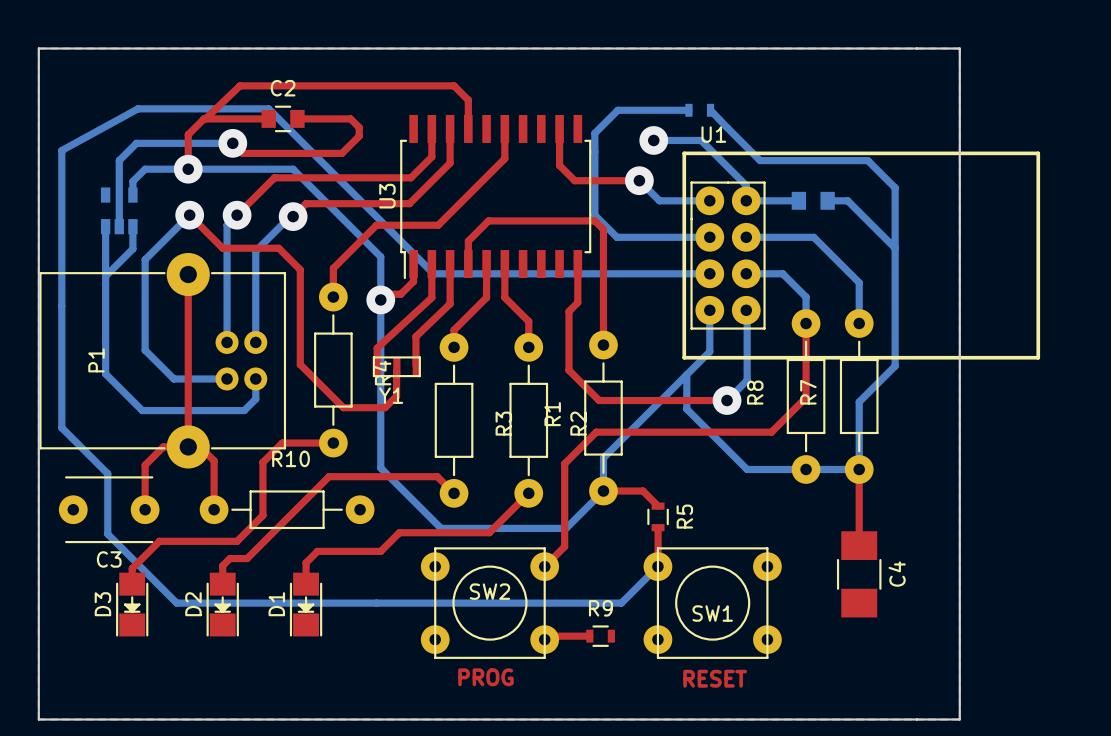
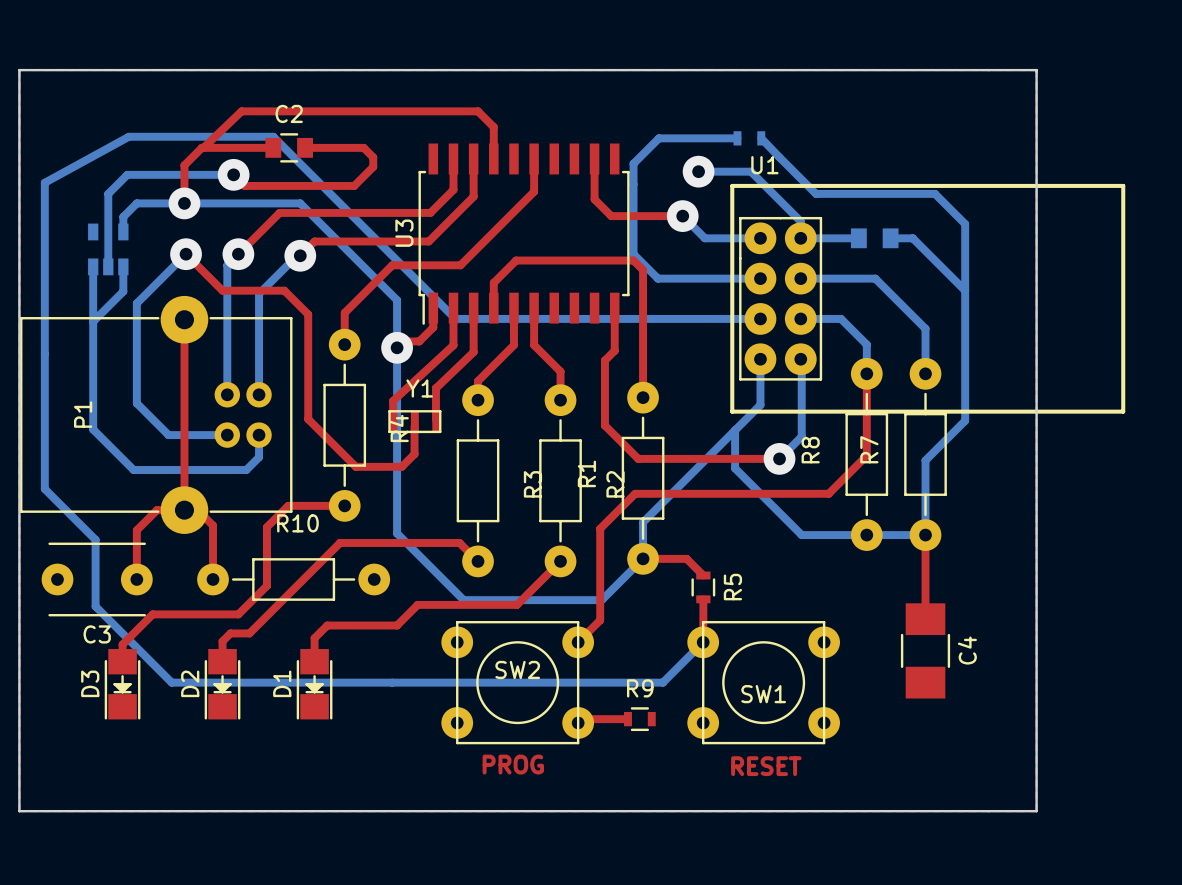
Y1 name position: Y1 (391, 395) -> Y1 (419, 388)

